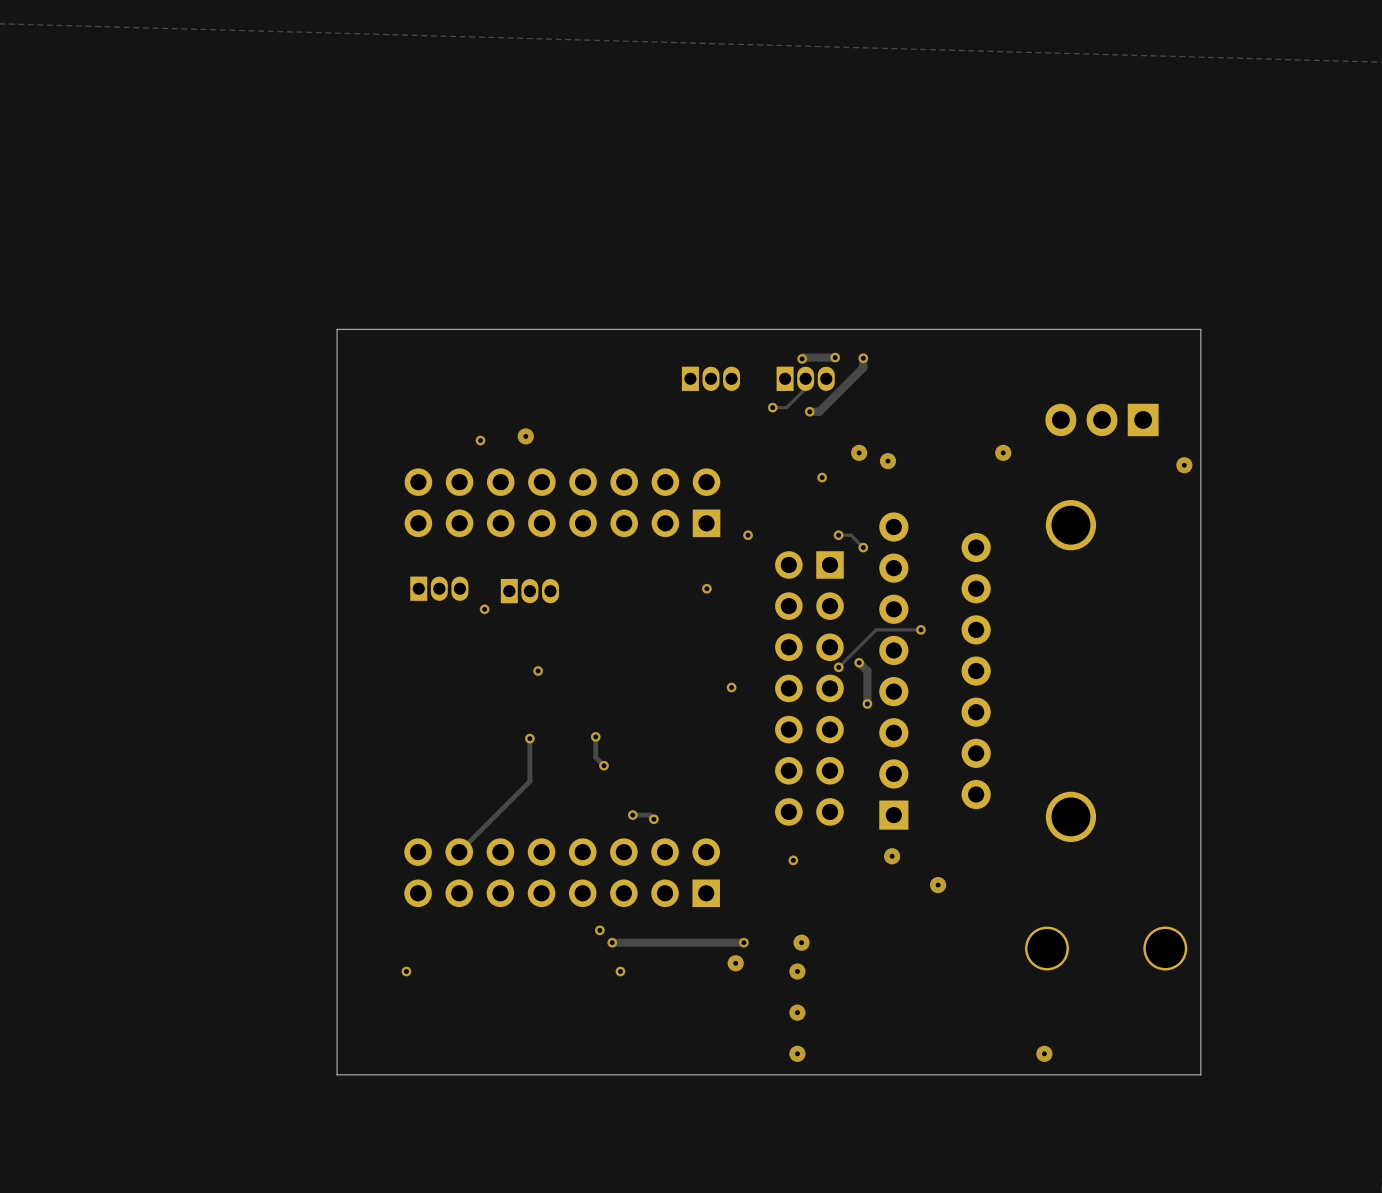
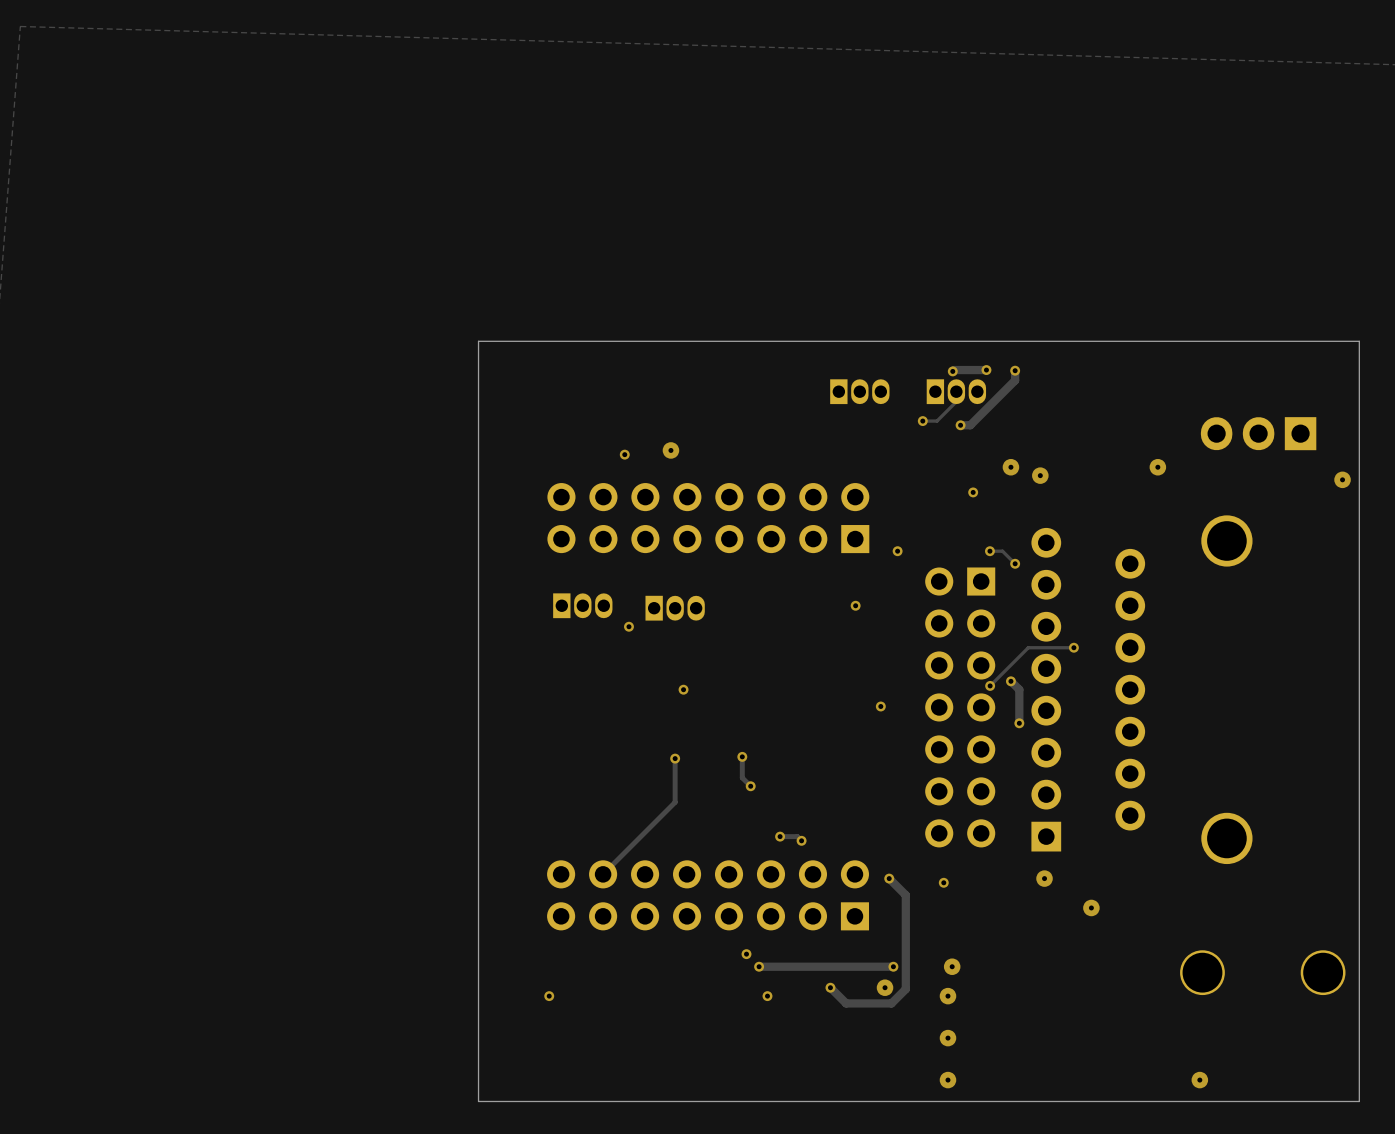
track: none -> (889, 878) (905, 895) (905, 989) (891, 1003) (846, 1003) (830, 987)
via: none -> (889, 878)
via: none -> (830, 987)

